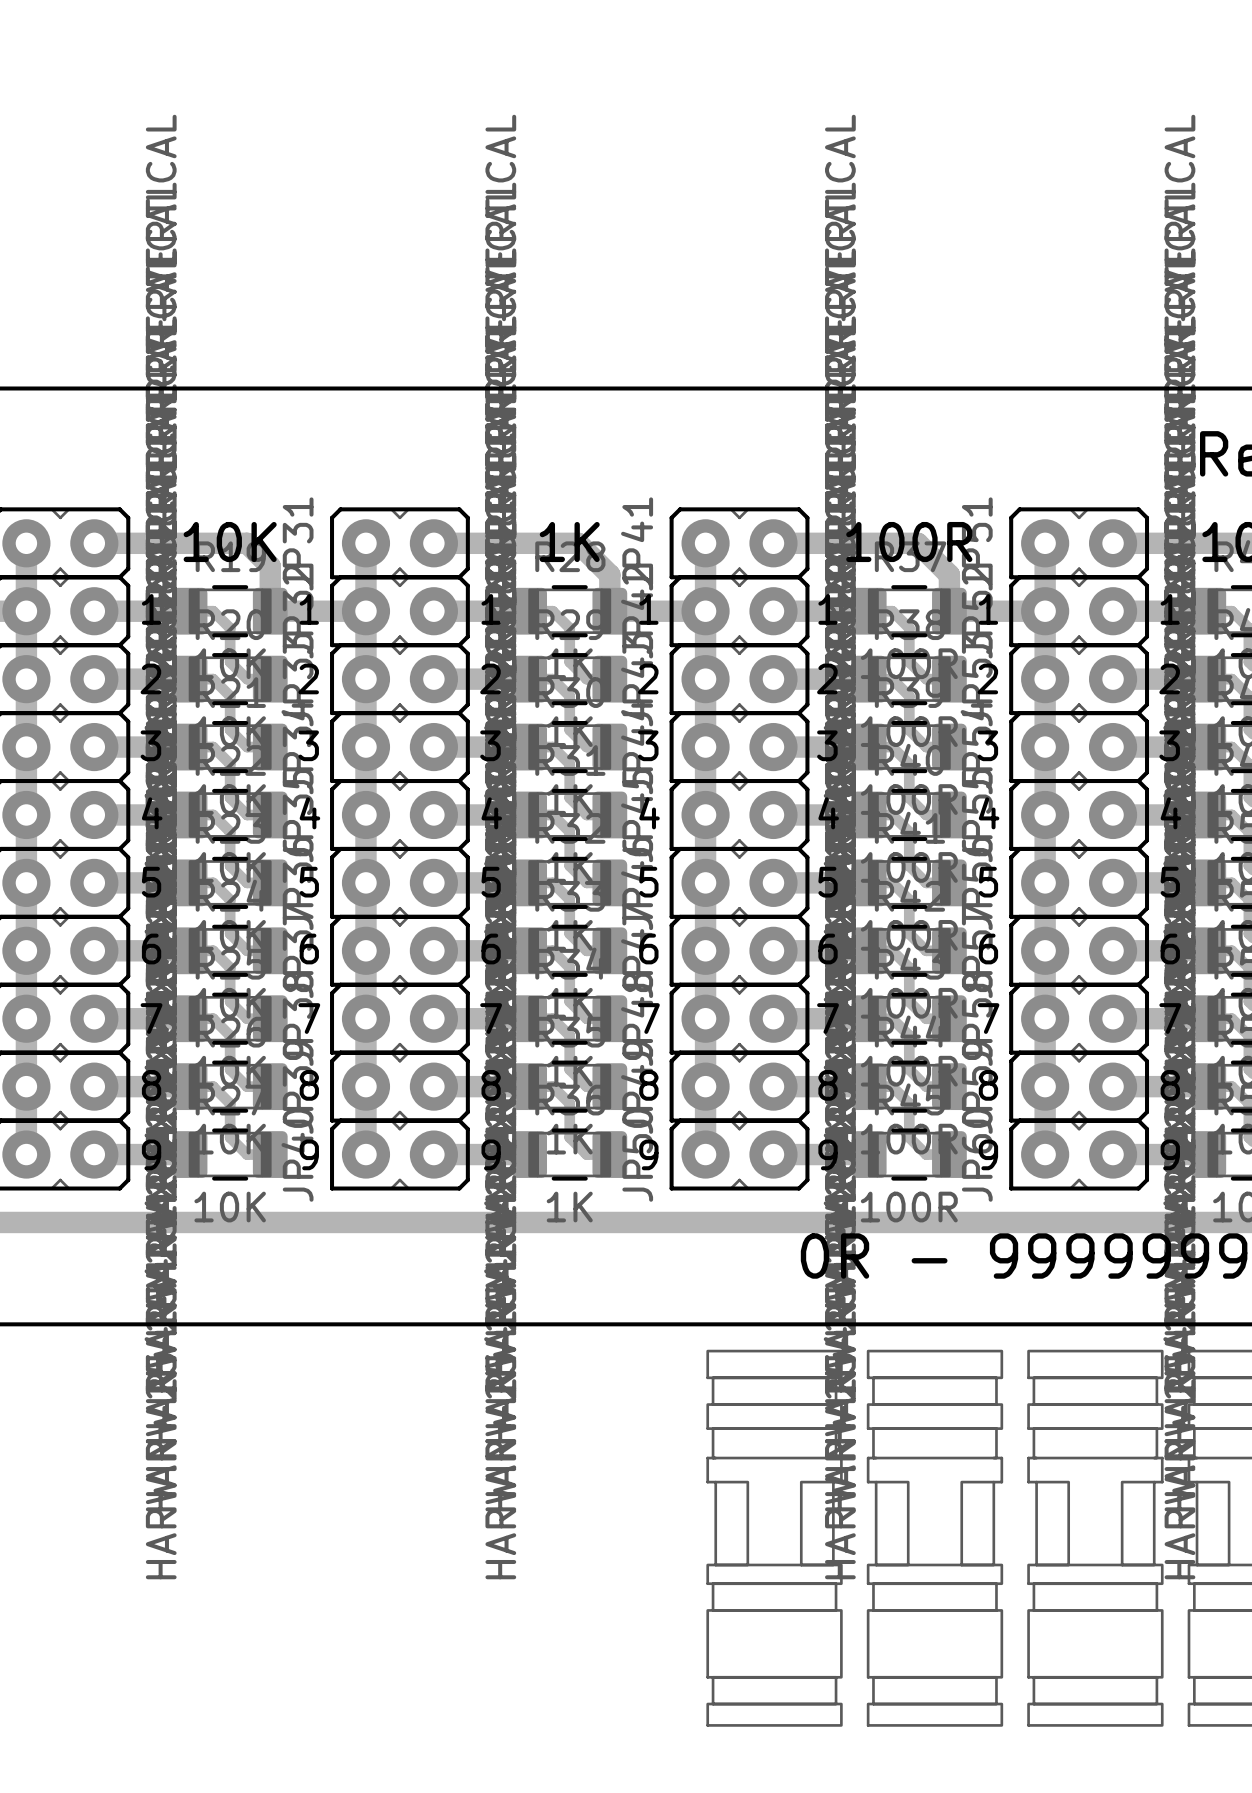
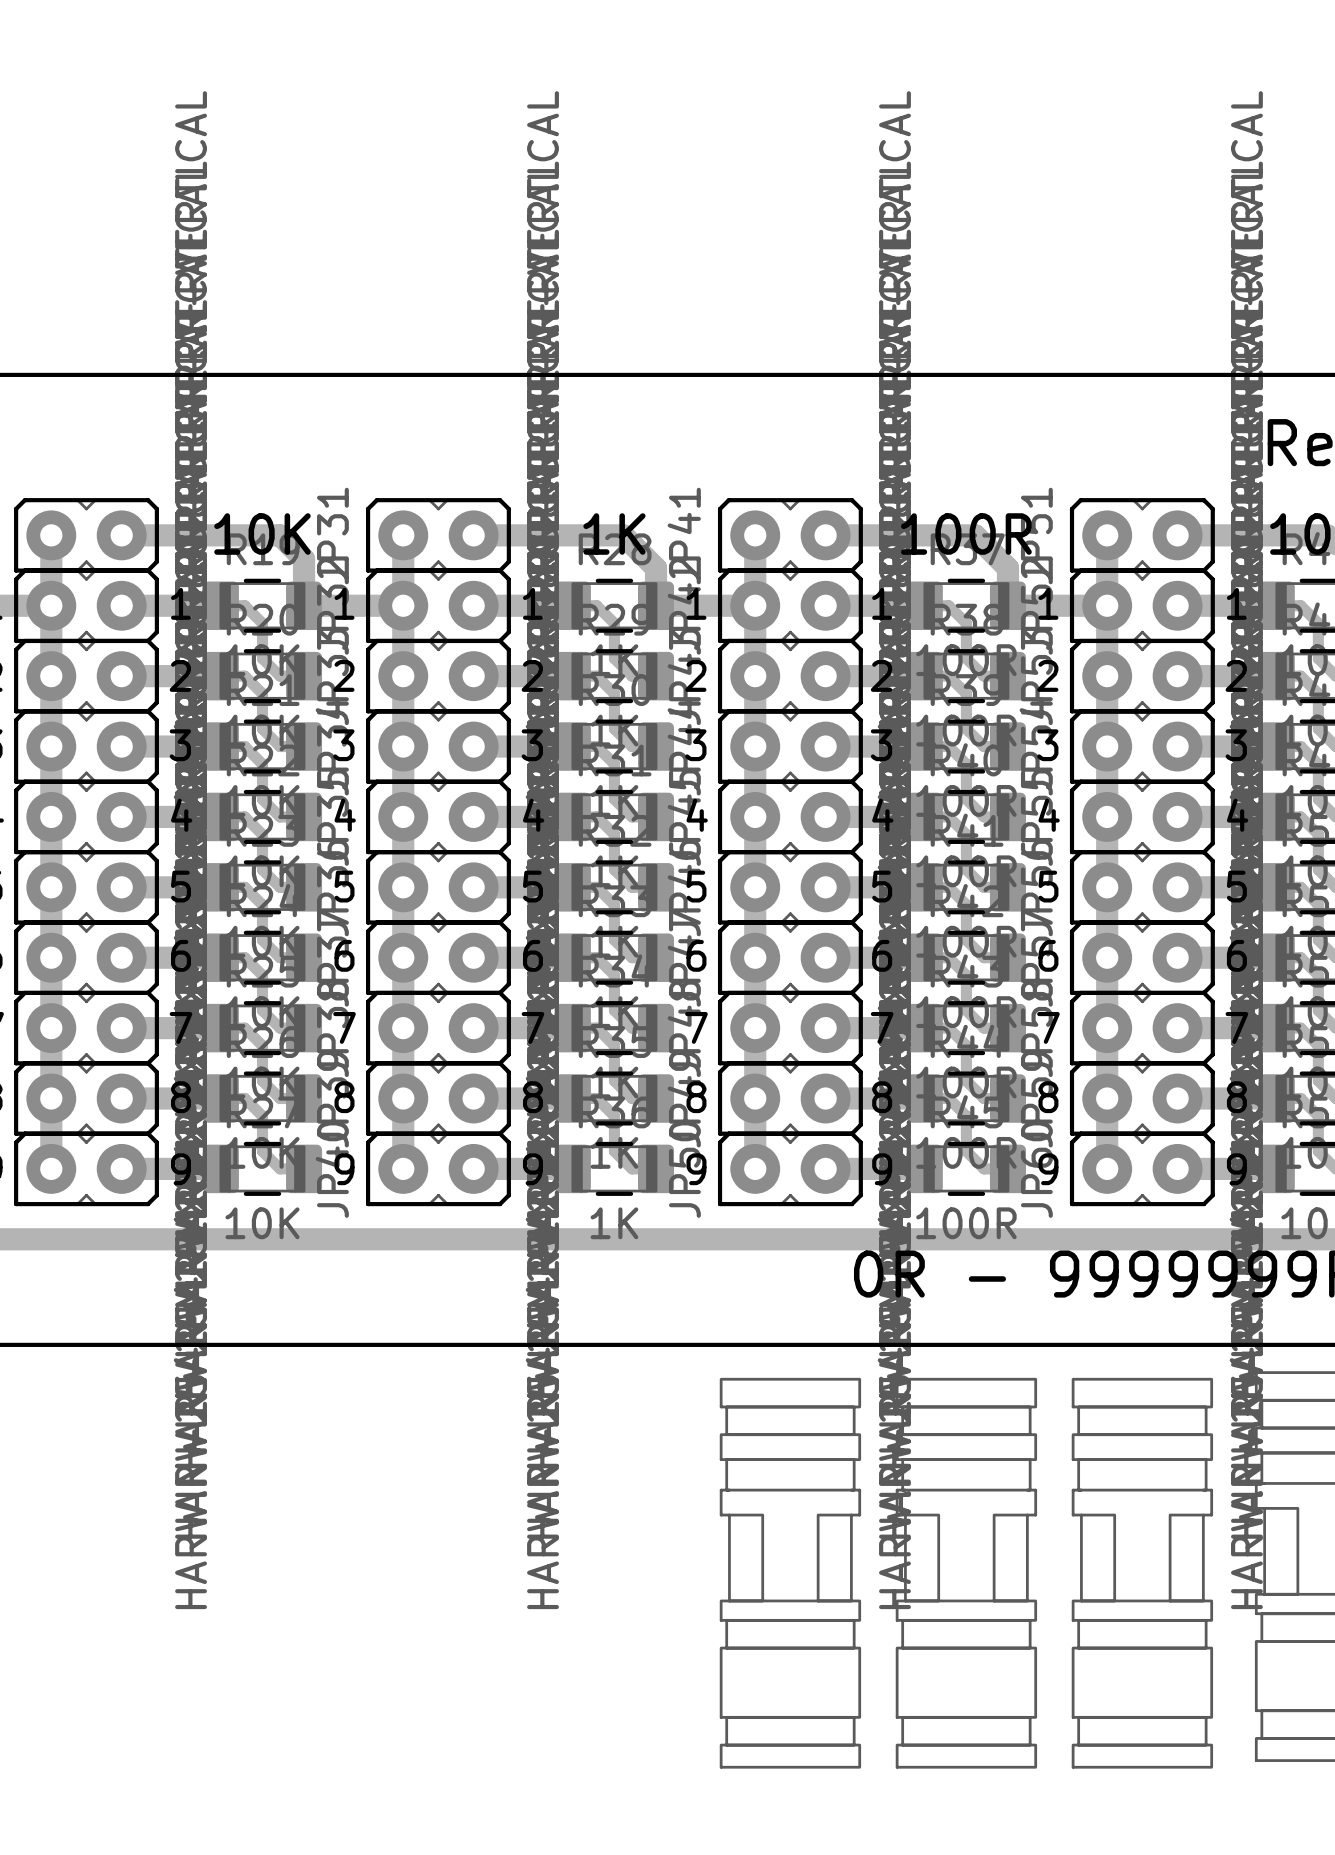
drawing position: (774, 1538) -> (790, 1573)
drawing position: (934, 1538) -> (966, 1573)
drawing position: (1095, 1538) -> (1142, 1573)

